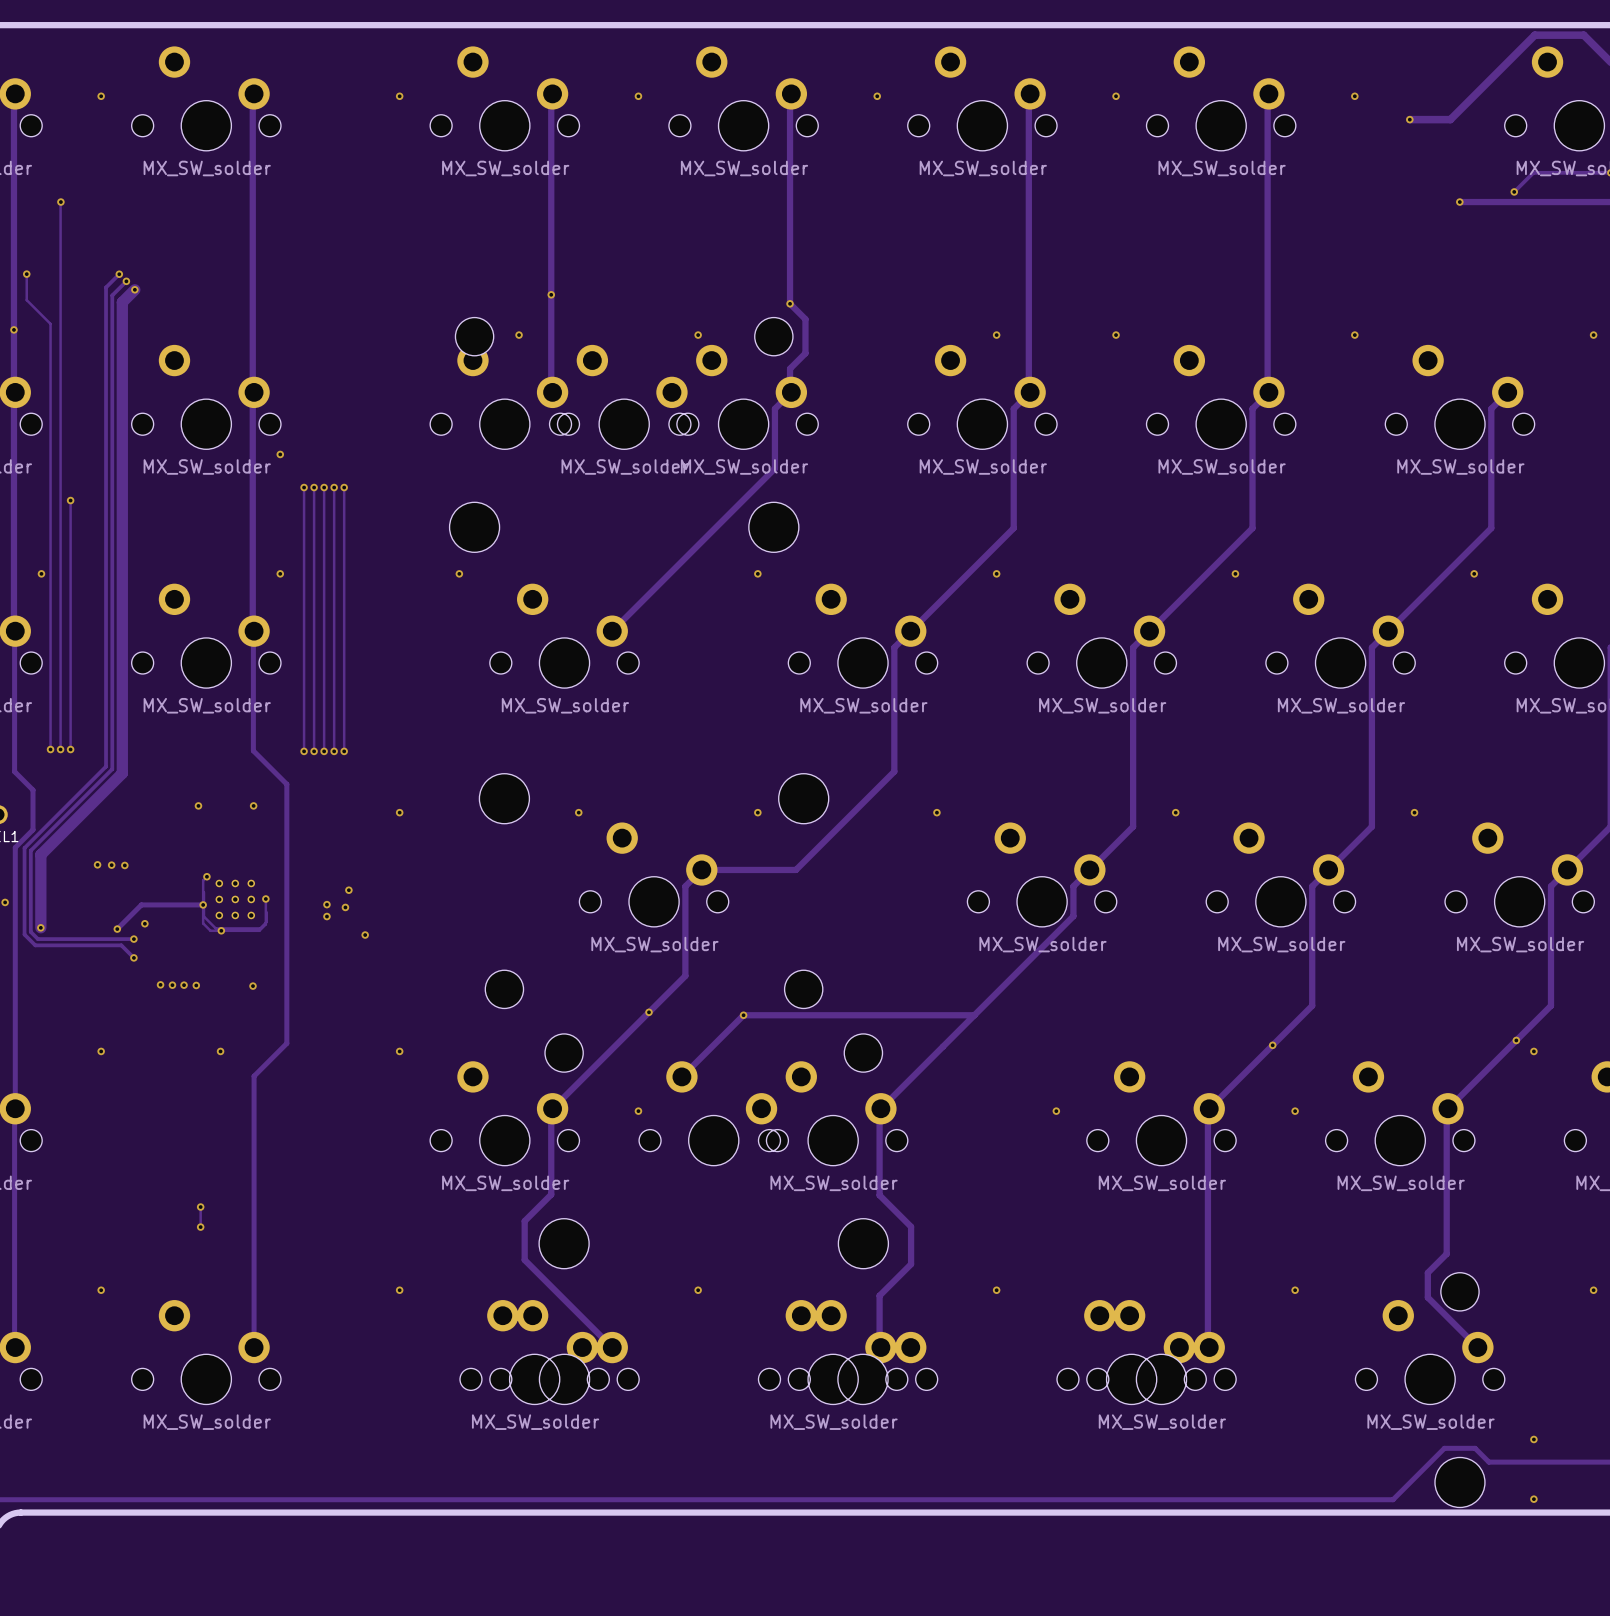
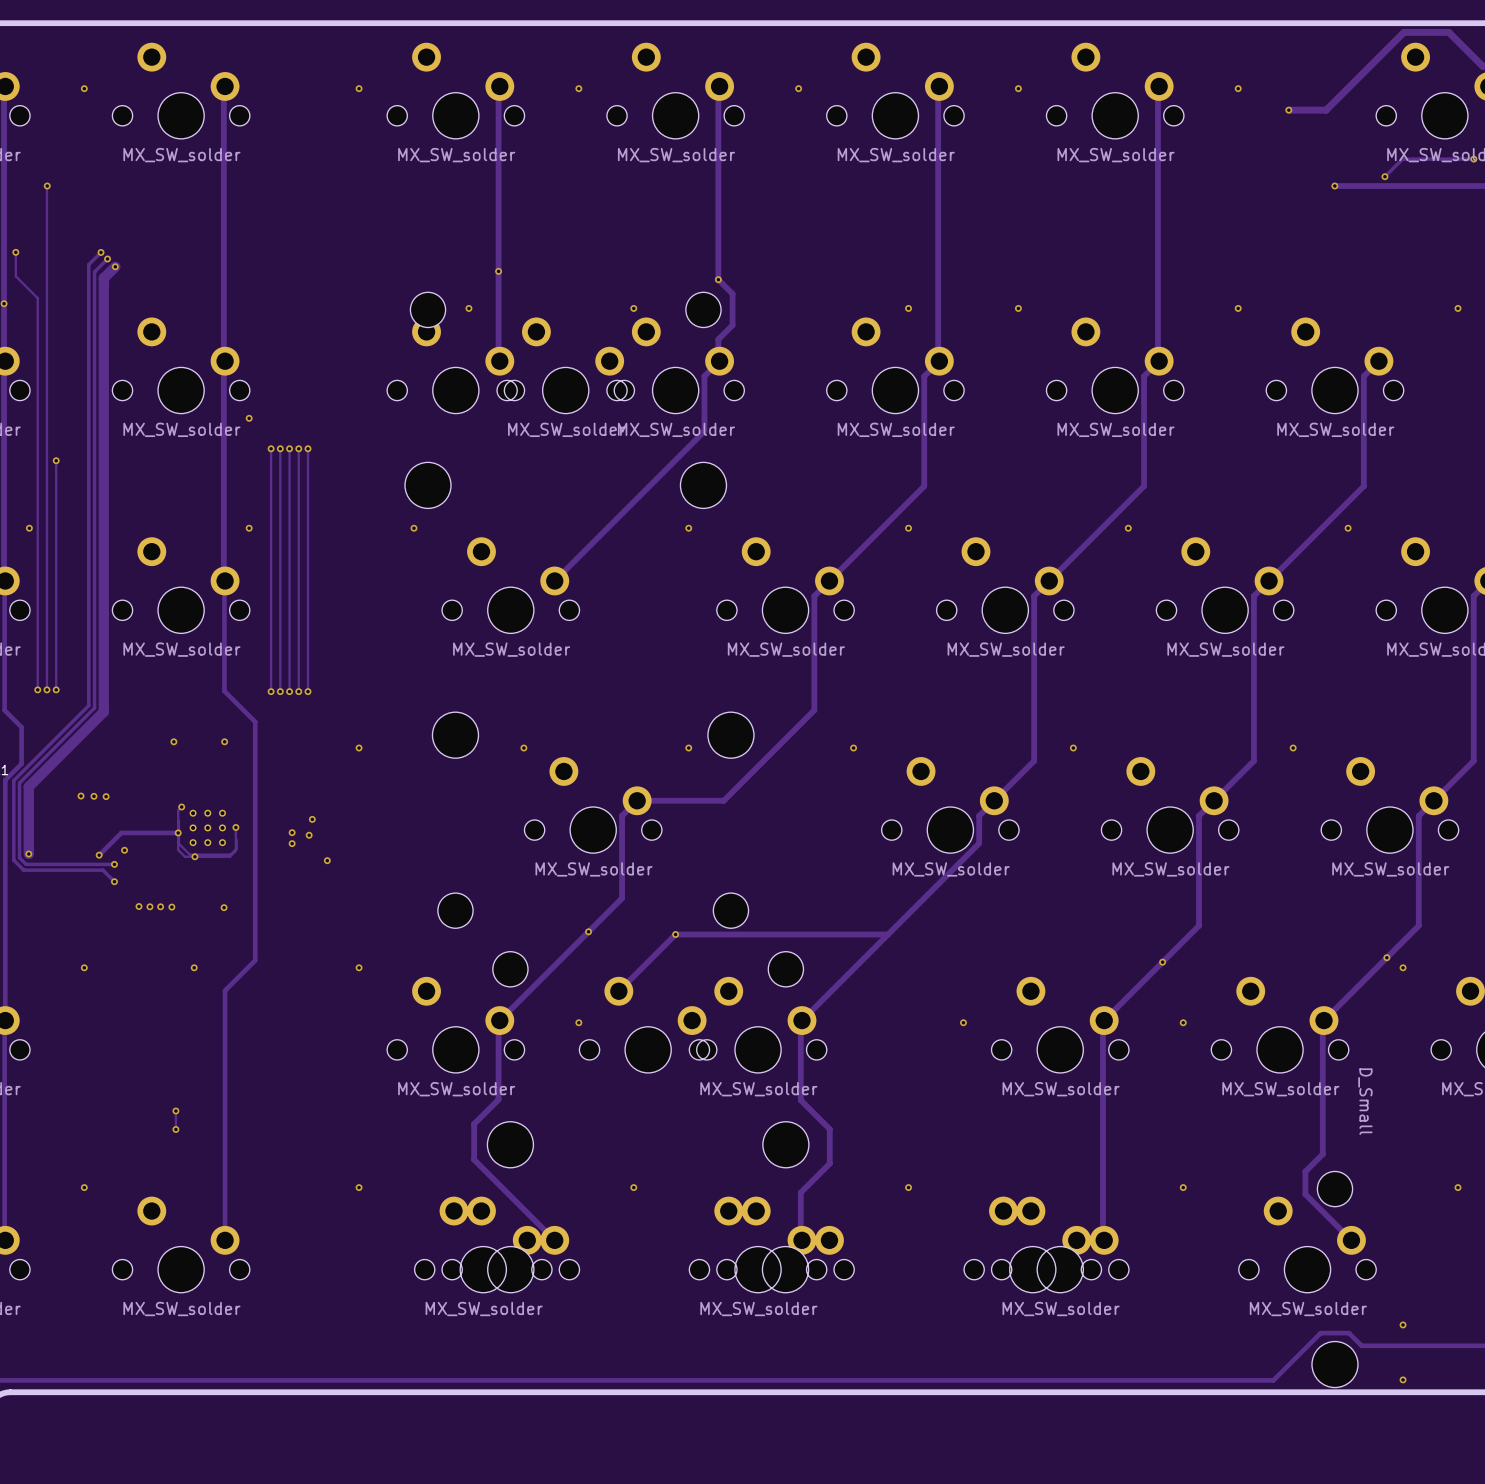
part: none -> D_Small (1365, 1101)

